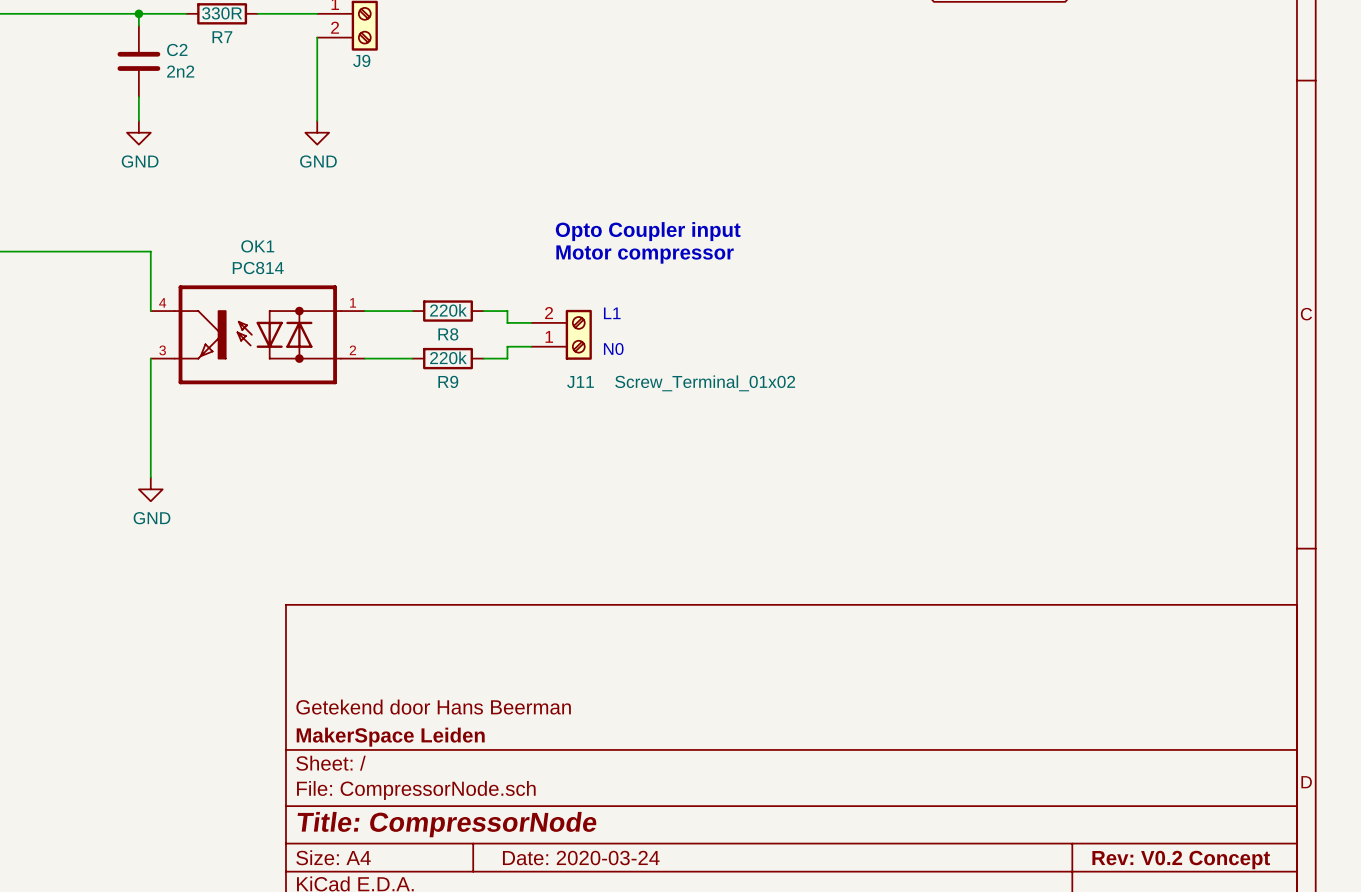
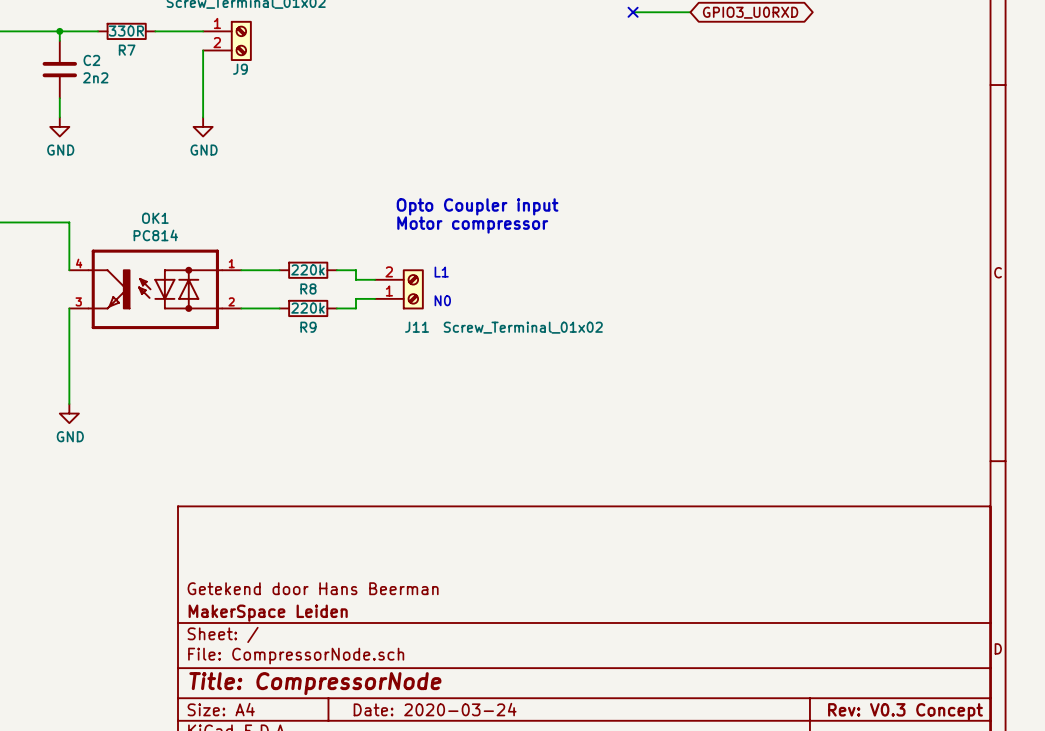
title block: Rev: V0.2 Concept (1181, 860) -> Rev: V0.3 Concept (905, 711)

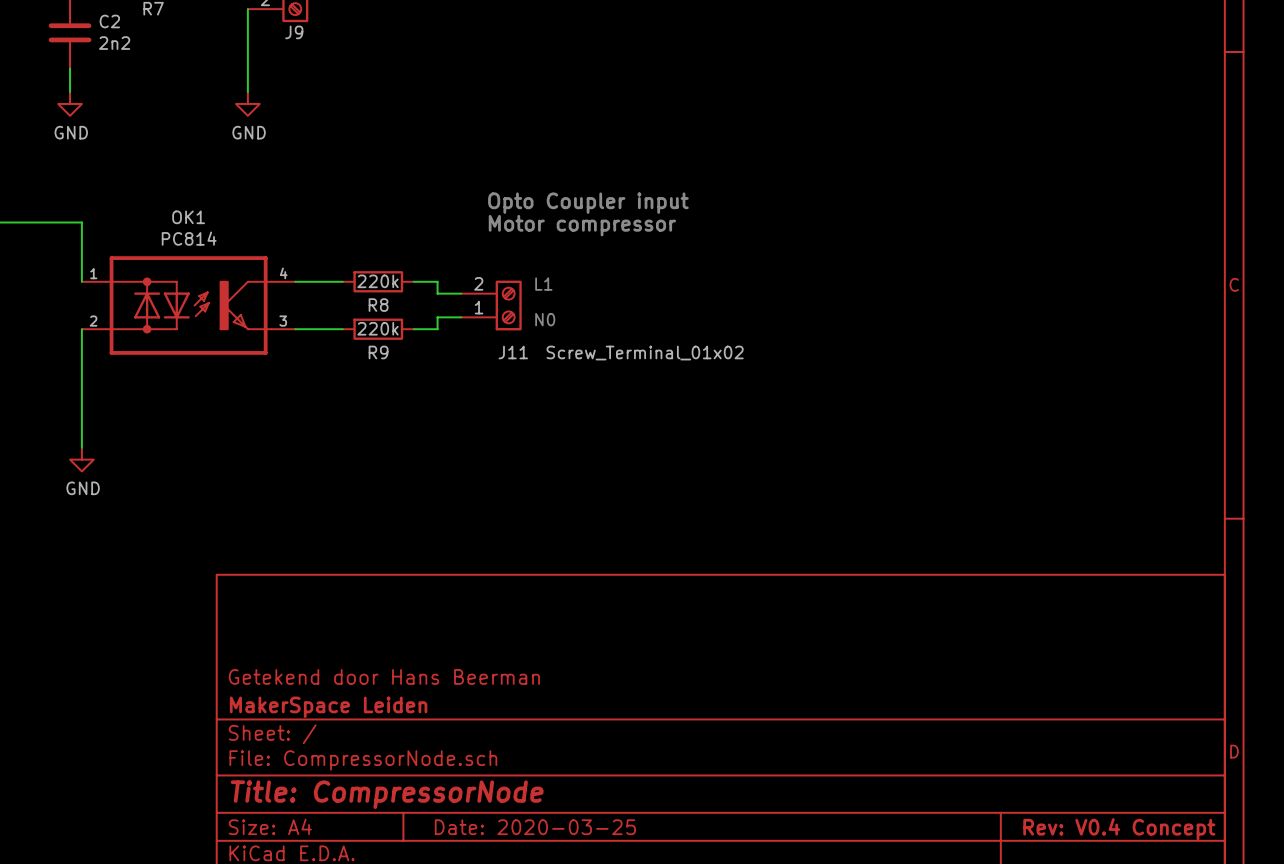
OK1 flip: as is (155, 289) -> left-right (188, 305)
title block: Date: 2020-03-24 (435, 709) -> Date: 2020-03-25 (535, 827)
title block: Rev: V0.3 Concept (905, 711) -> Rev: V0.4 Concept (1119, 829)

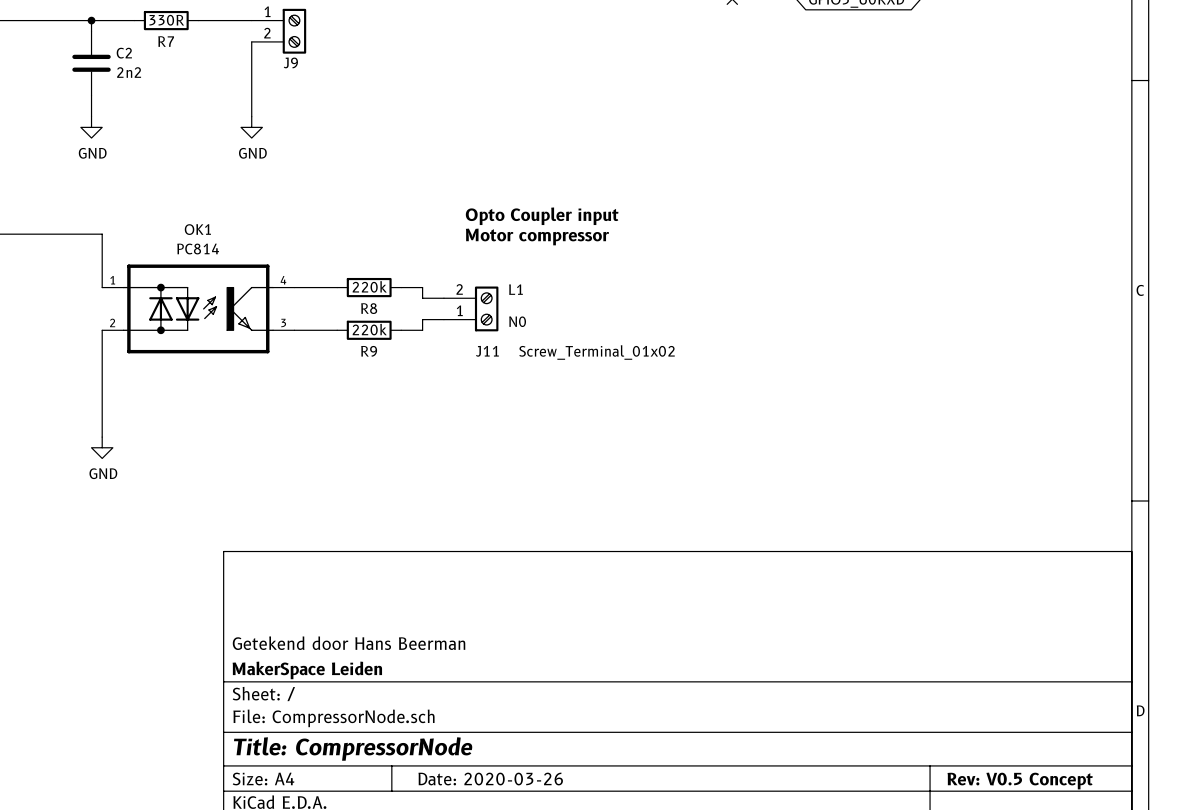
title block: Date: 2020-03-25 (535, 827) -> Date: 2020-03-26 (490, 779)
title block: Rev: V0.4 Concept (1119, 829) -> Rev: V0.5 Concept (1020, 781)

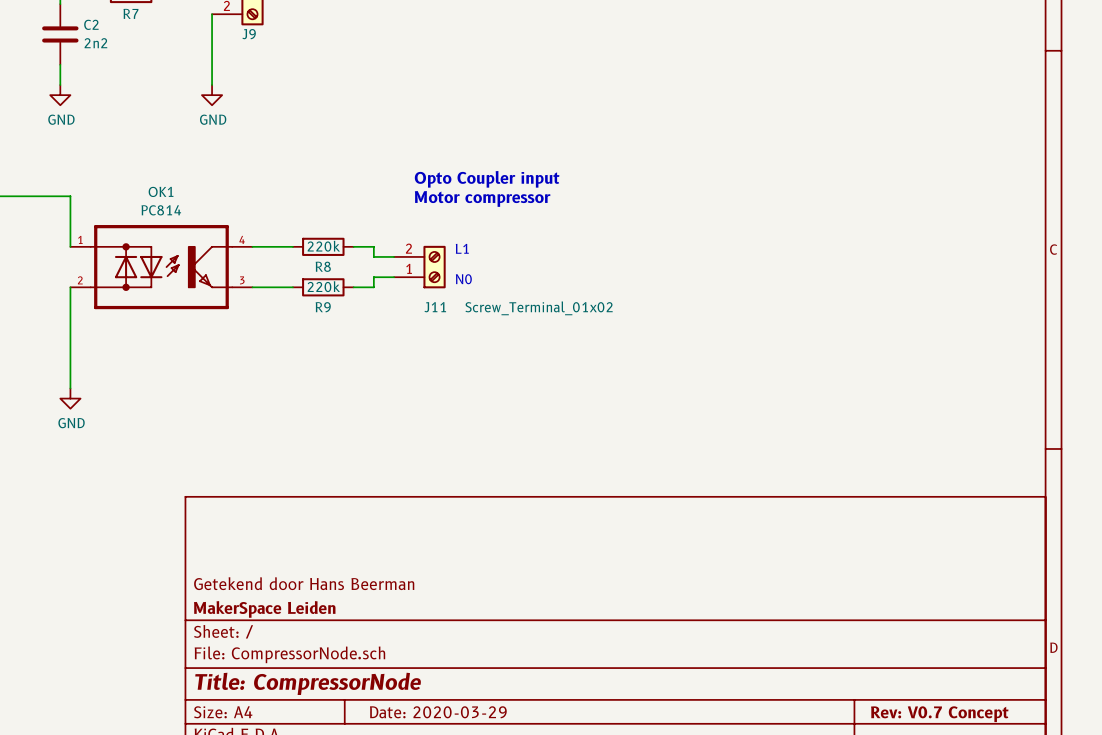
title block: Date: 2020-03-26 (490, 779) -> Date: 2020-03-29 (438, 712)
title block: Rev: V0.5 Concept (1020, 781) -> Rev: V0.7 Concept (939, 714)

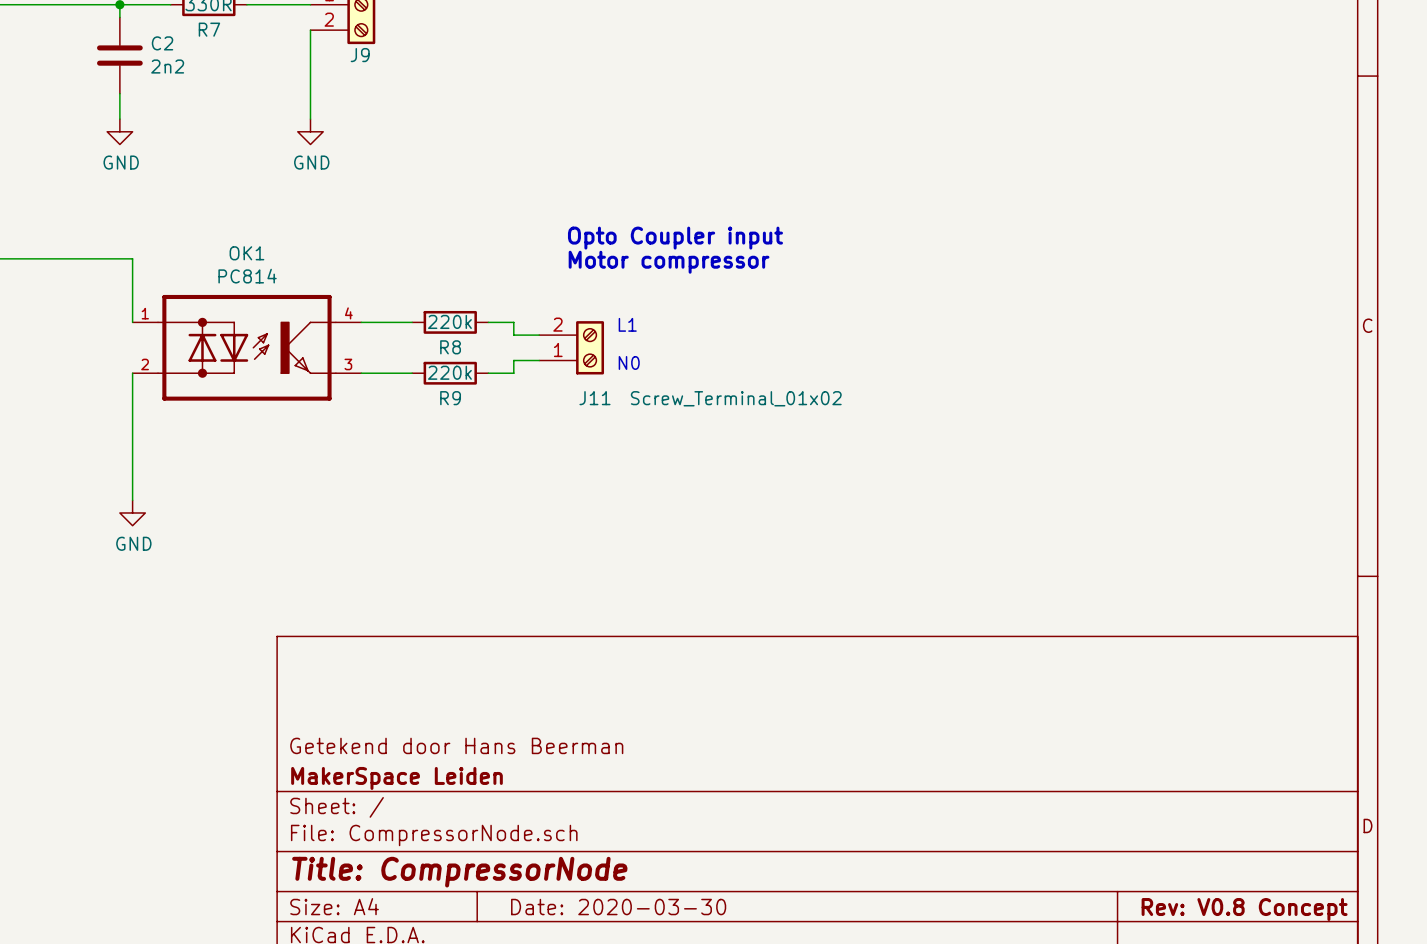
title block: Date: 2020-03-29 (438, 712) -> Date: 2020-03-30 (618, 907)
title block: Rev: V0.7 Concept (939, 714) -> Rev: V0.8 Concept (1244, 909)

